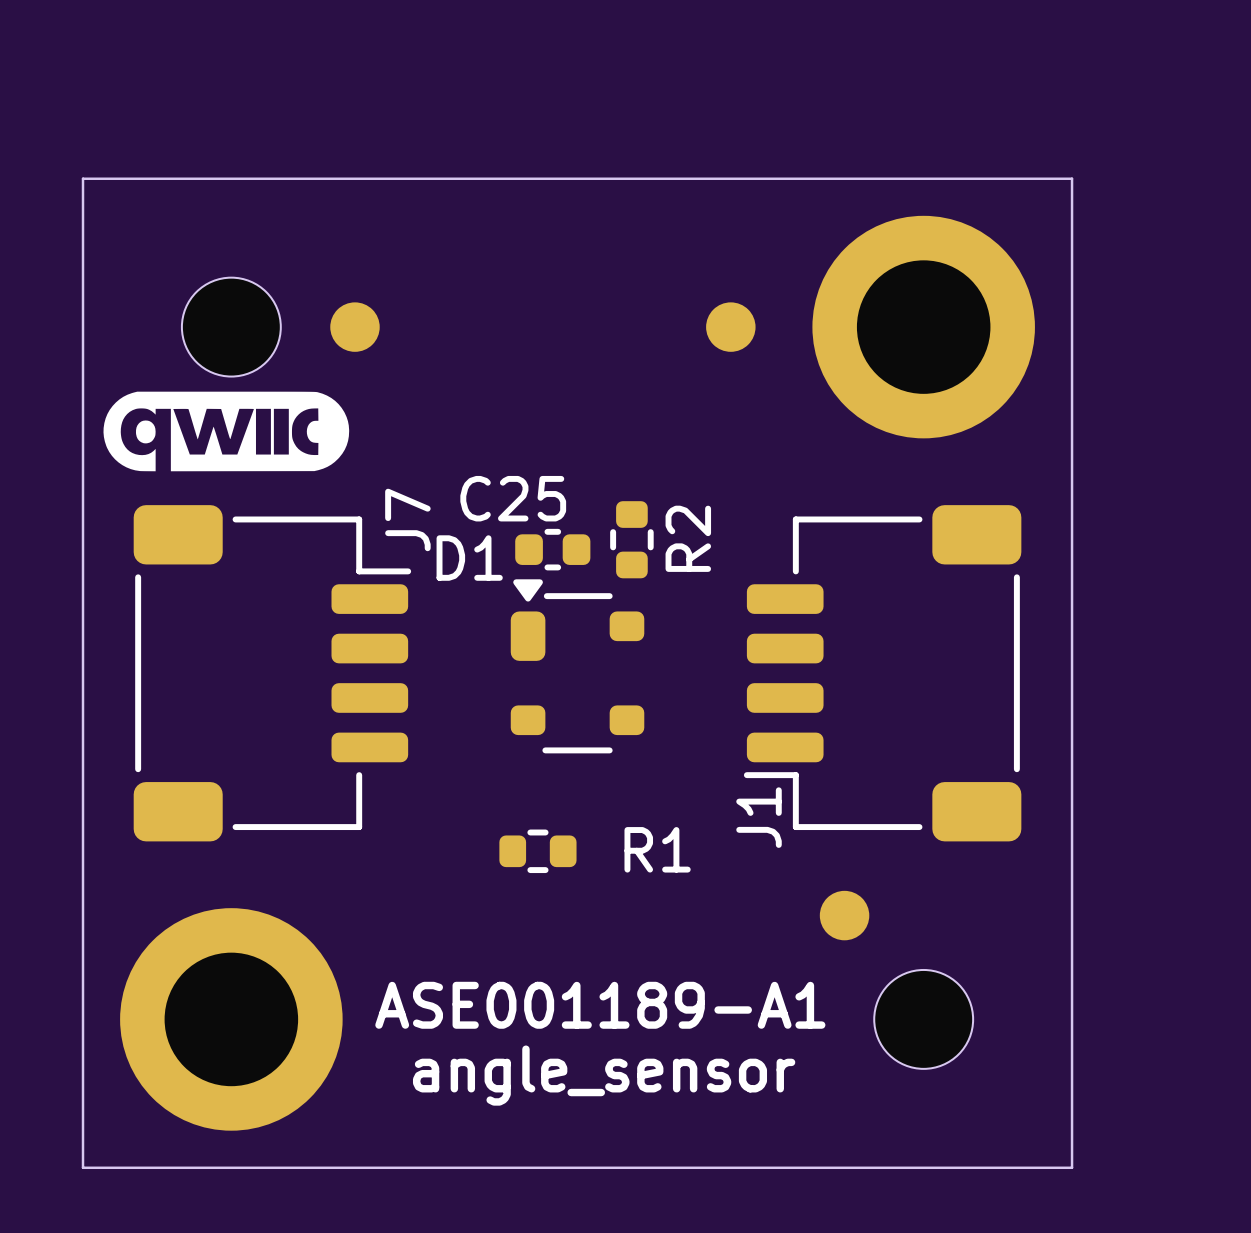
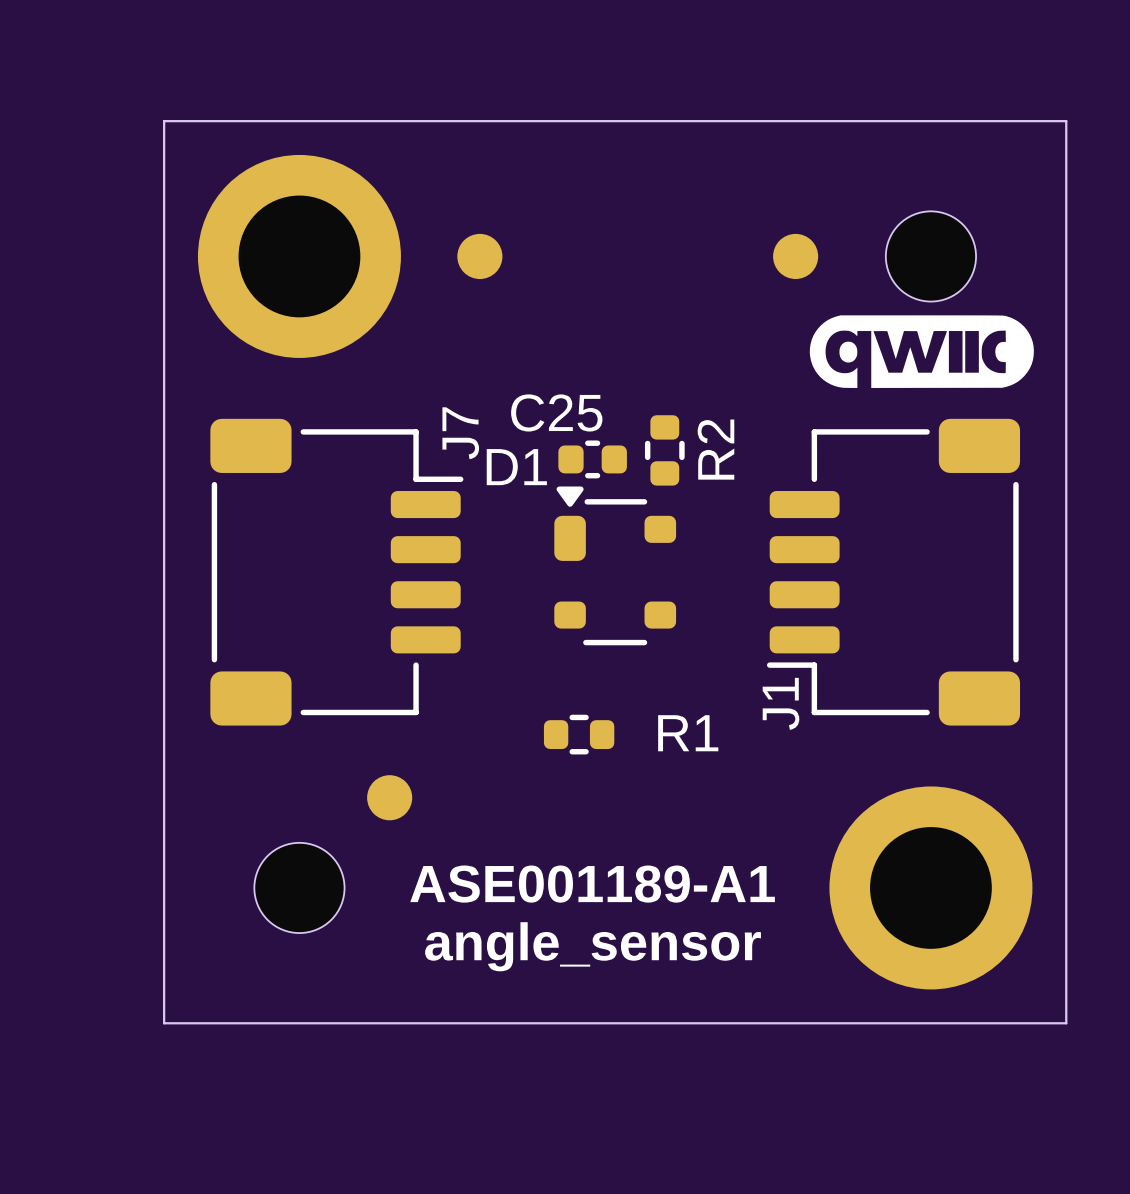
part footprint: [812, 215, 1035, 439] -> [885, 211, 977, 302]
part footprint: [181, 277, 281, 377] -> [197, 154, 401, 358]
part position: (354, 327) -> (479, 256)
part position: (730, 327) -> (795, 256)
drawing position: (226, 431) -> (921, 351)
part footprint: [120, 908, 343, 1131] -> [254, 842, 345, 934]
part: (844, 915) -> none
part: none -> (389, 797)
part footprint: [874, 969, 974, 1069] -> [829, 786, 1033, 990]
text position: ASE001189-A1 (600, 1005) -> ASE001189-A1 (592, 884)
text position: angle_sensor (604, 1075) -> angle_sensor (593, 946)

